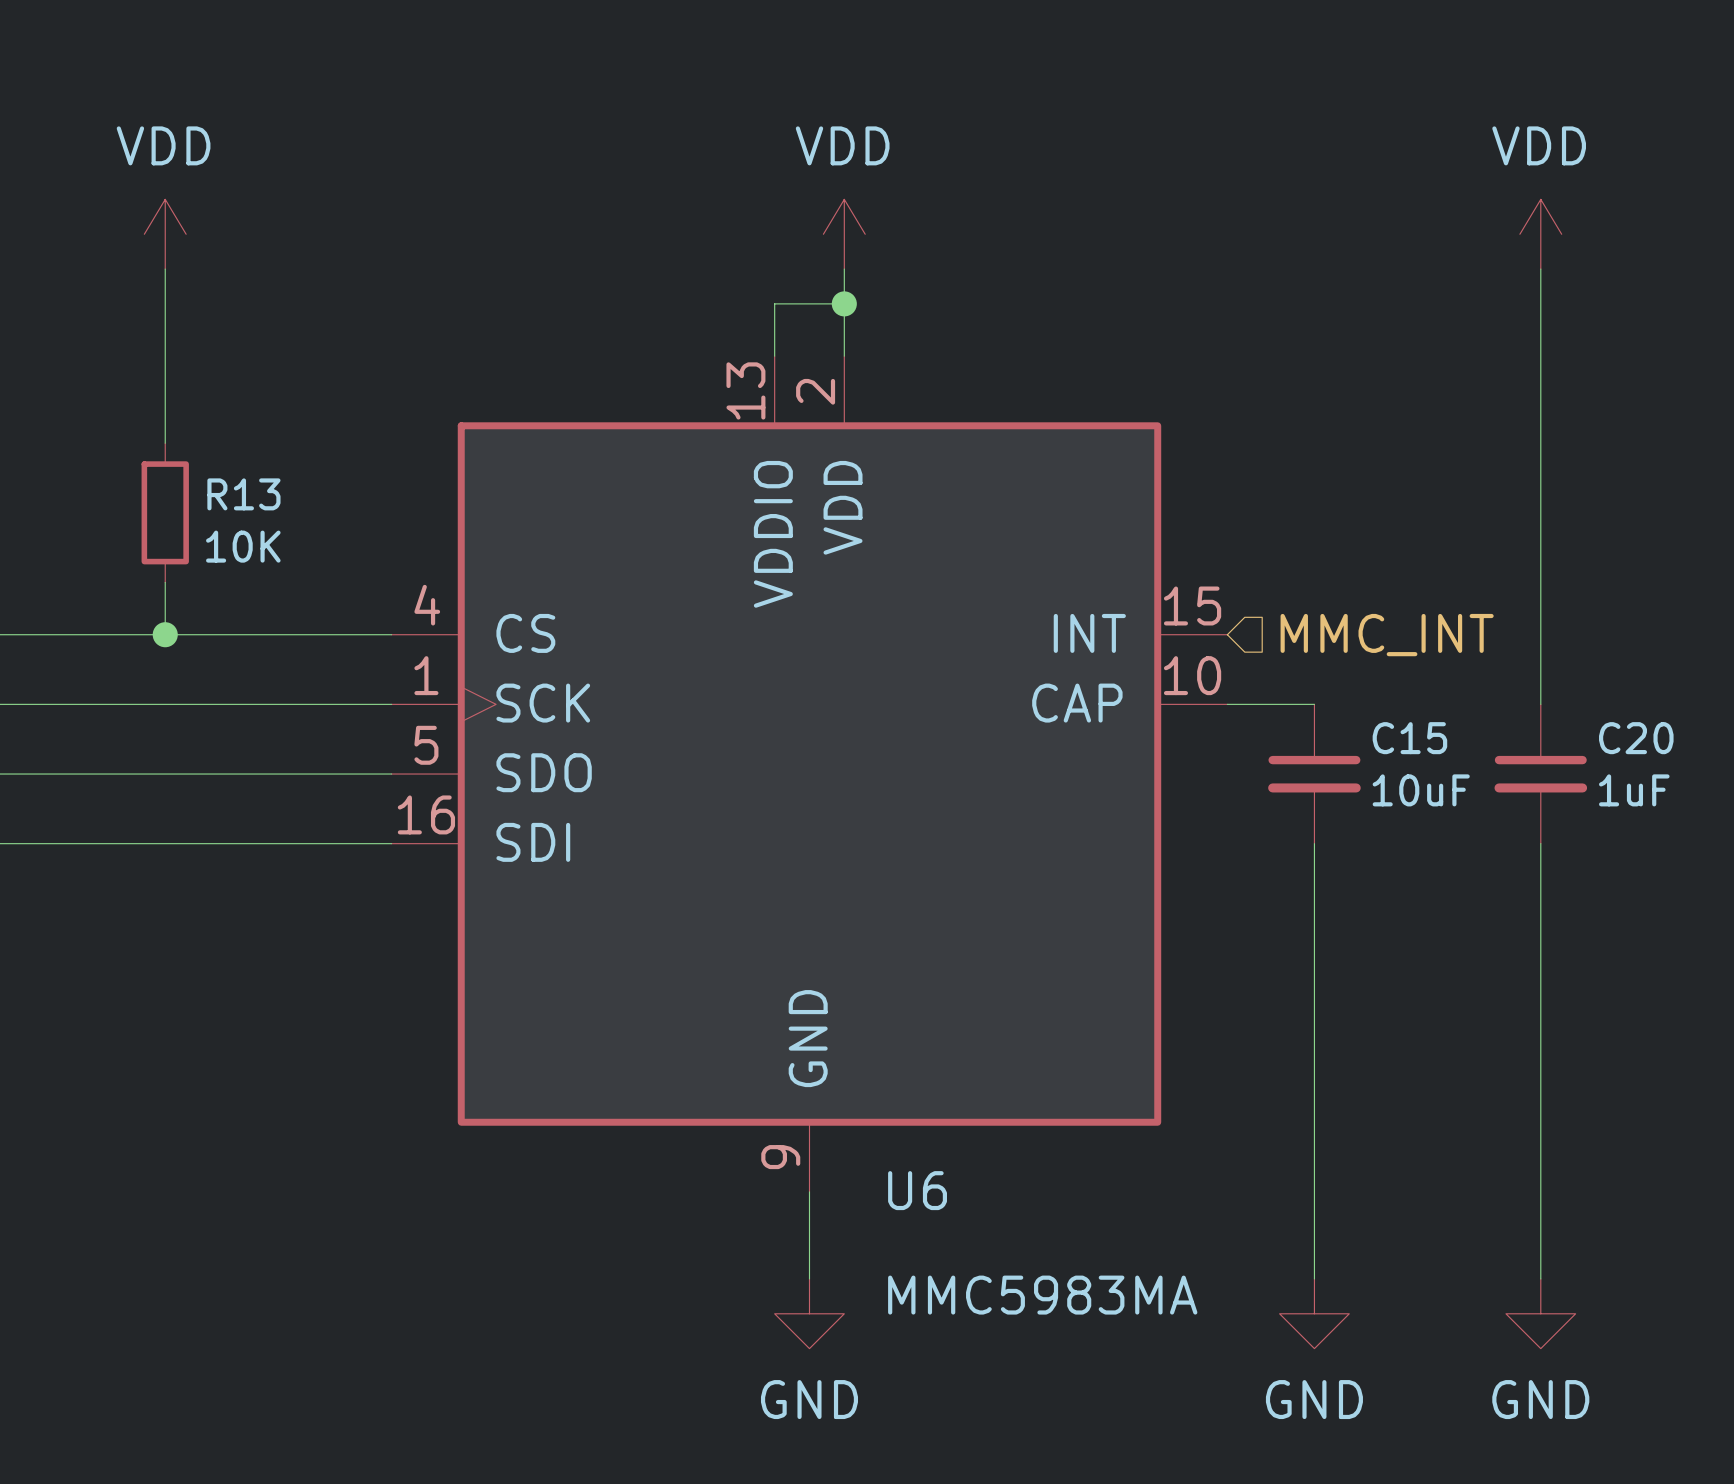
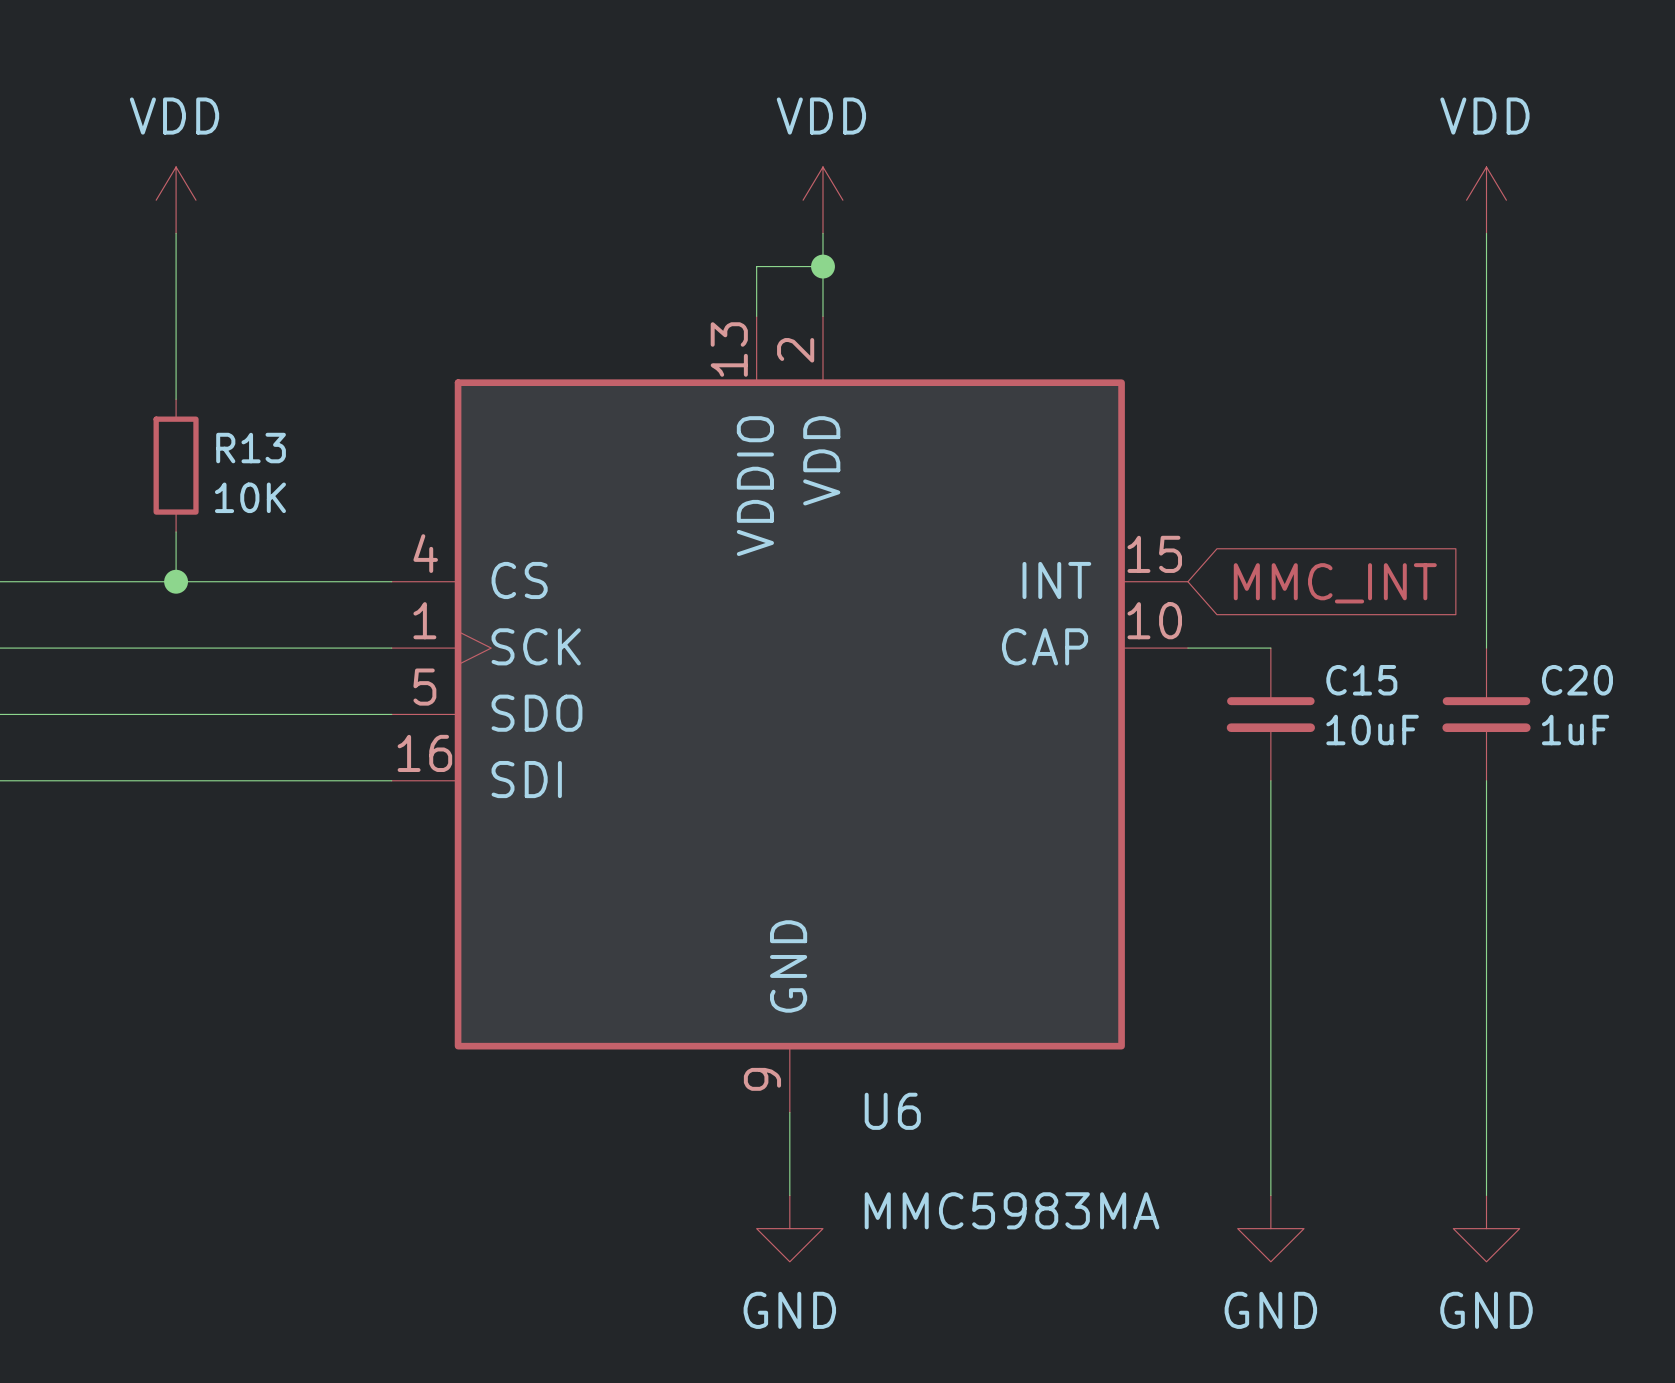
hierarchical label: MMC_INT (1387, 635) -> none
global label: none -> MMC_INT (1335, 583)

